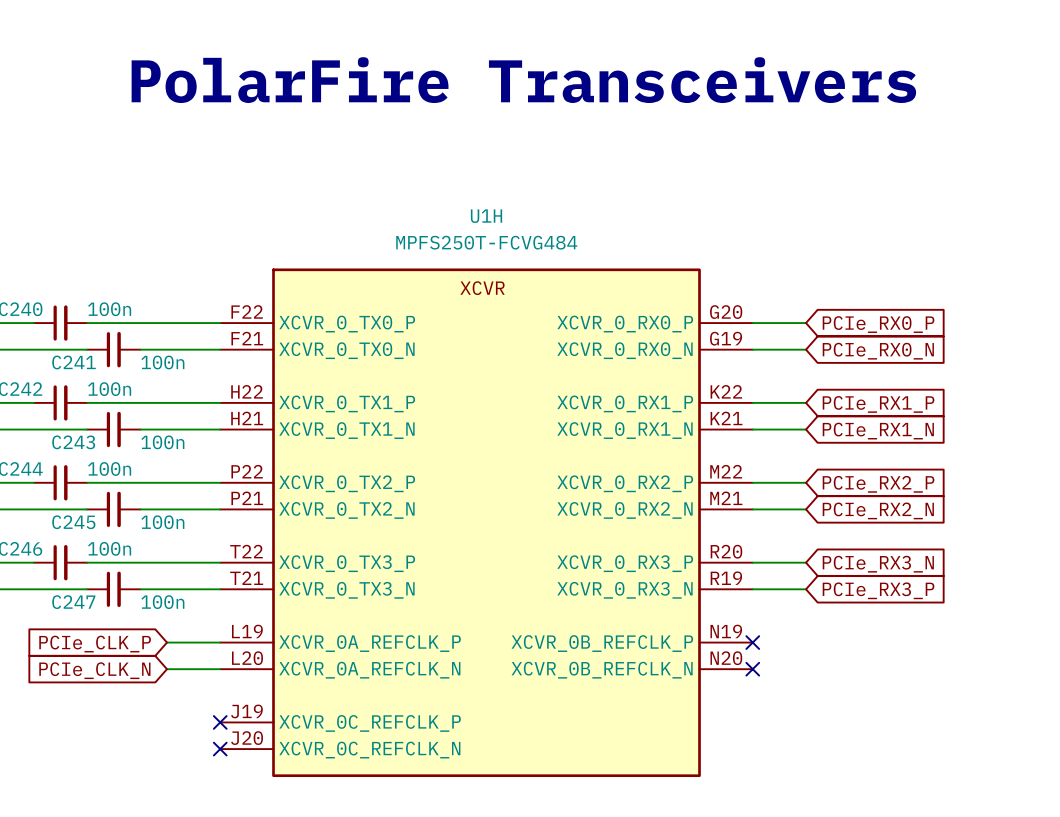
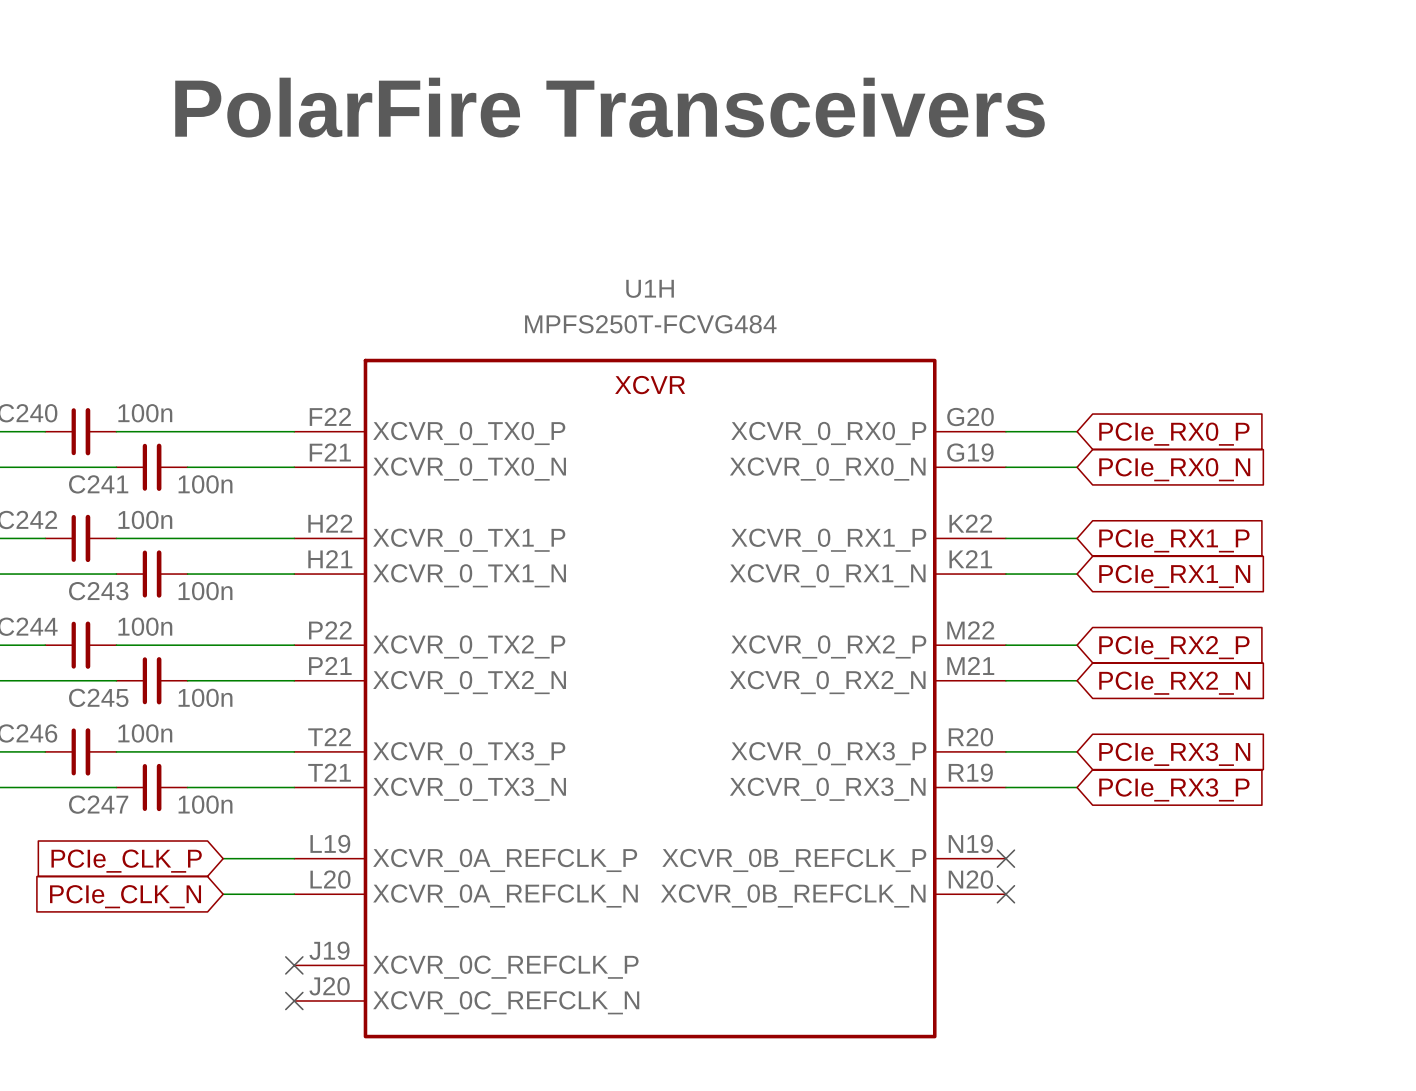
C241 text position: 100n (162, 362) -> 100n (205, 484)
C243 text position: 100n (162, 442) -> 100n (205, 591)
C245 text position: 100n (162, 522) -> 100n (205, 697)
C247 text position: 100n (162, 602) -> 100n (205, 804)

